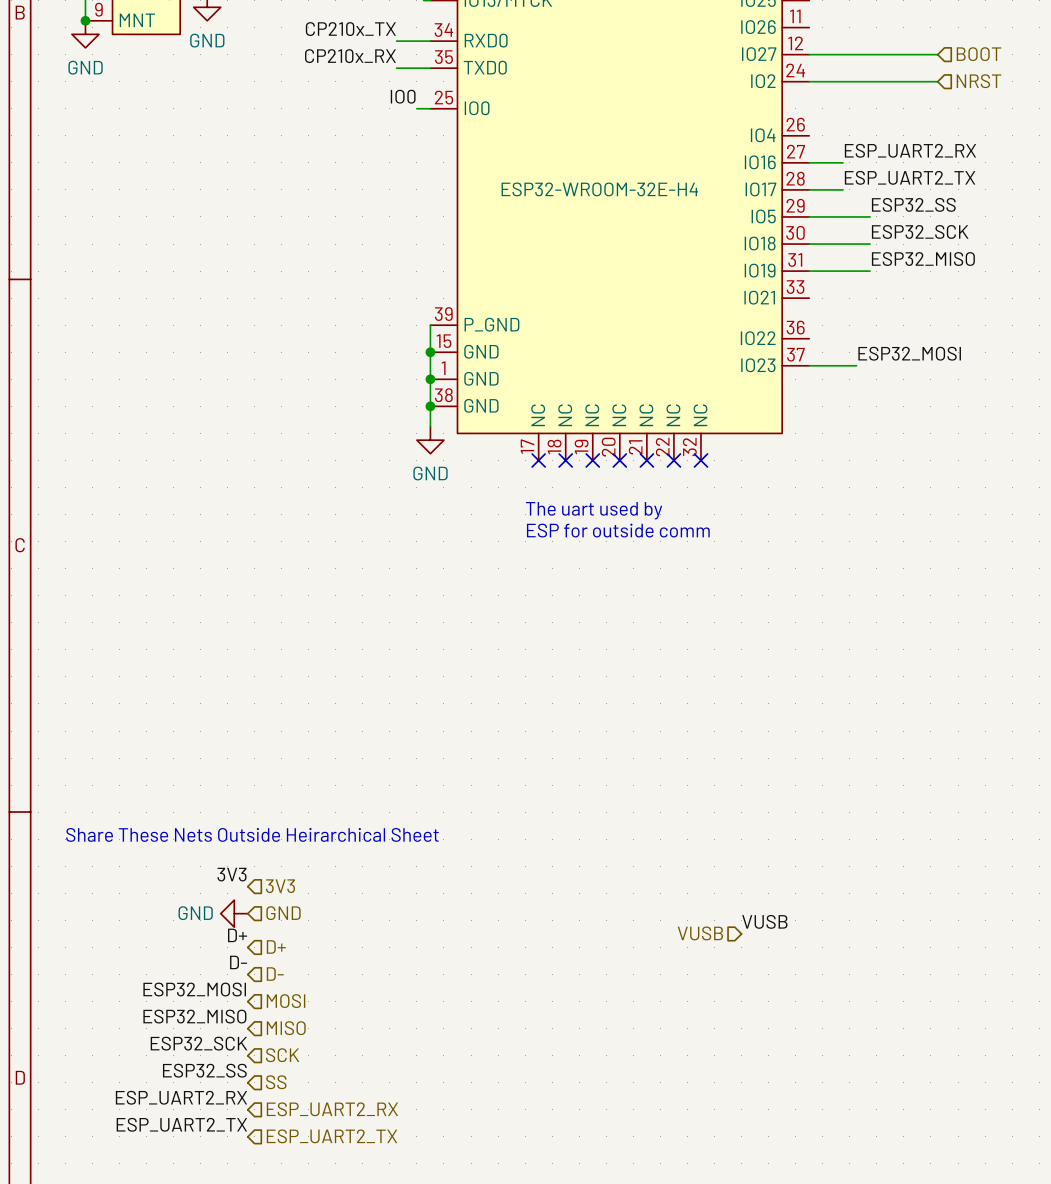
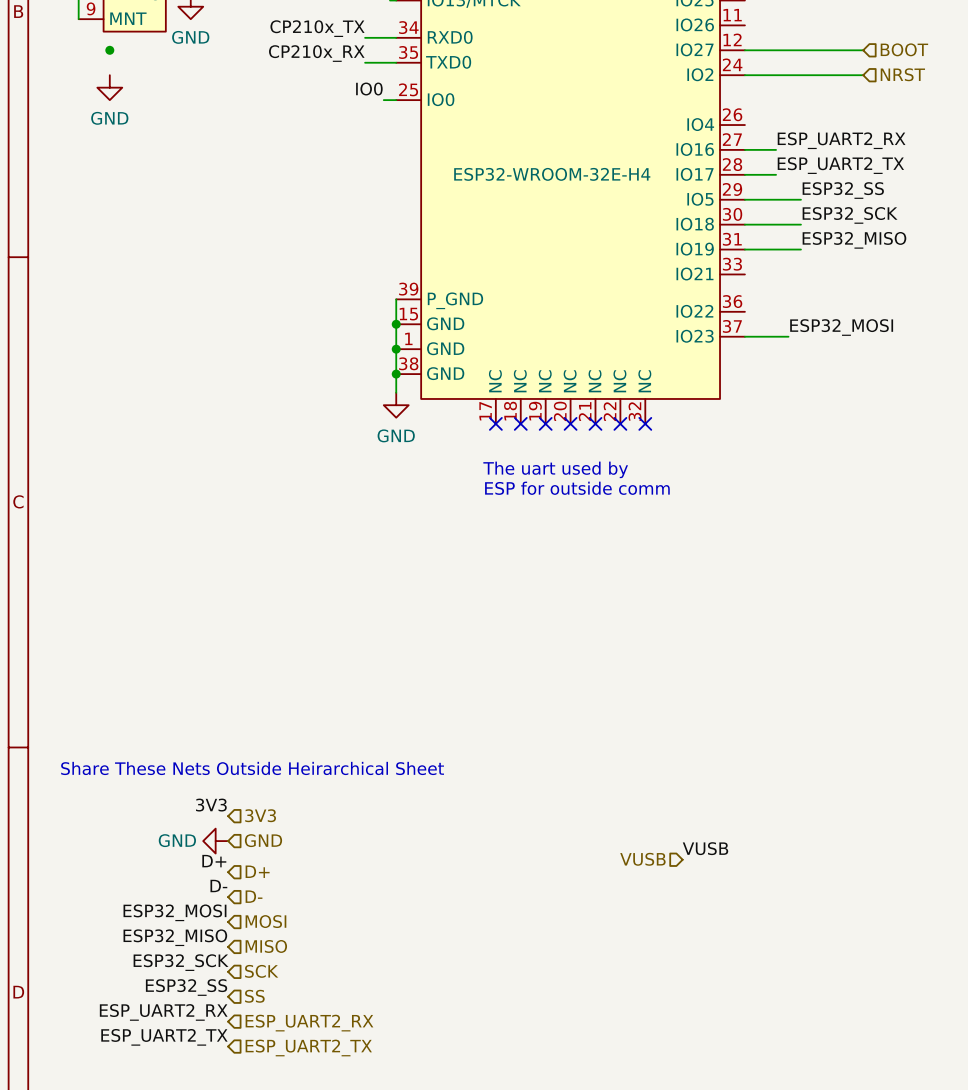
junction position: (85, 20) -> (109, 50)
power symbol position: GND (85, 34) -> GND (109, 87)

